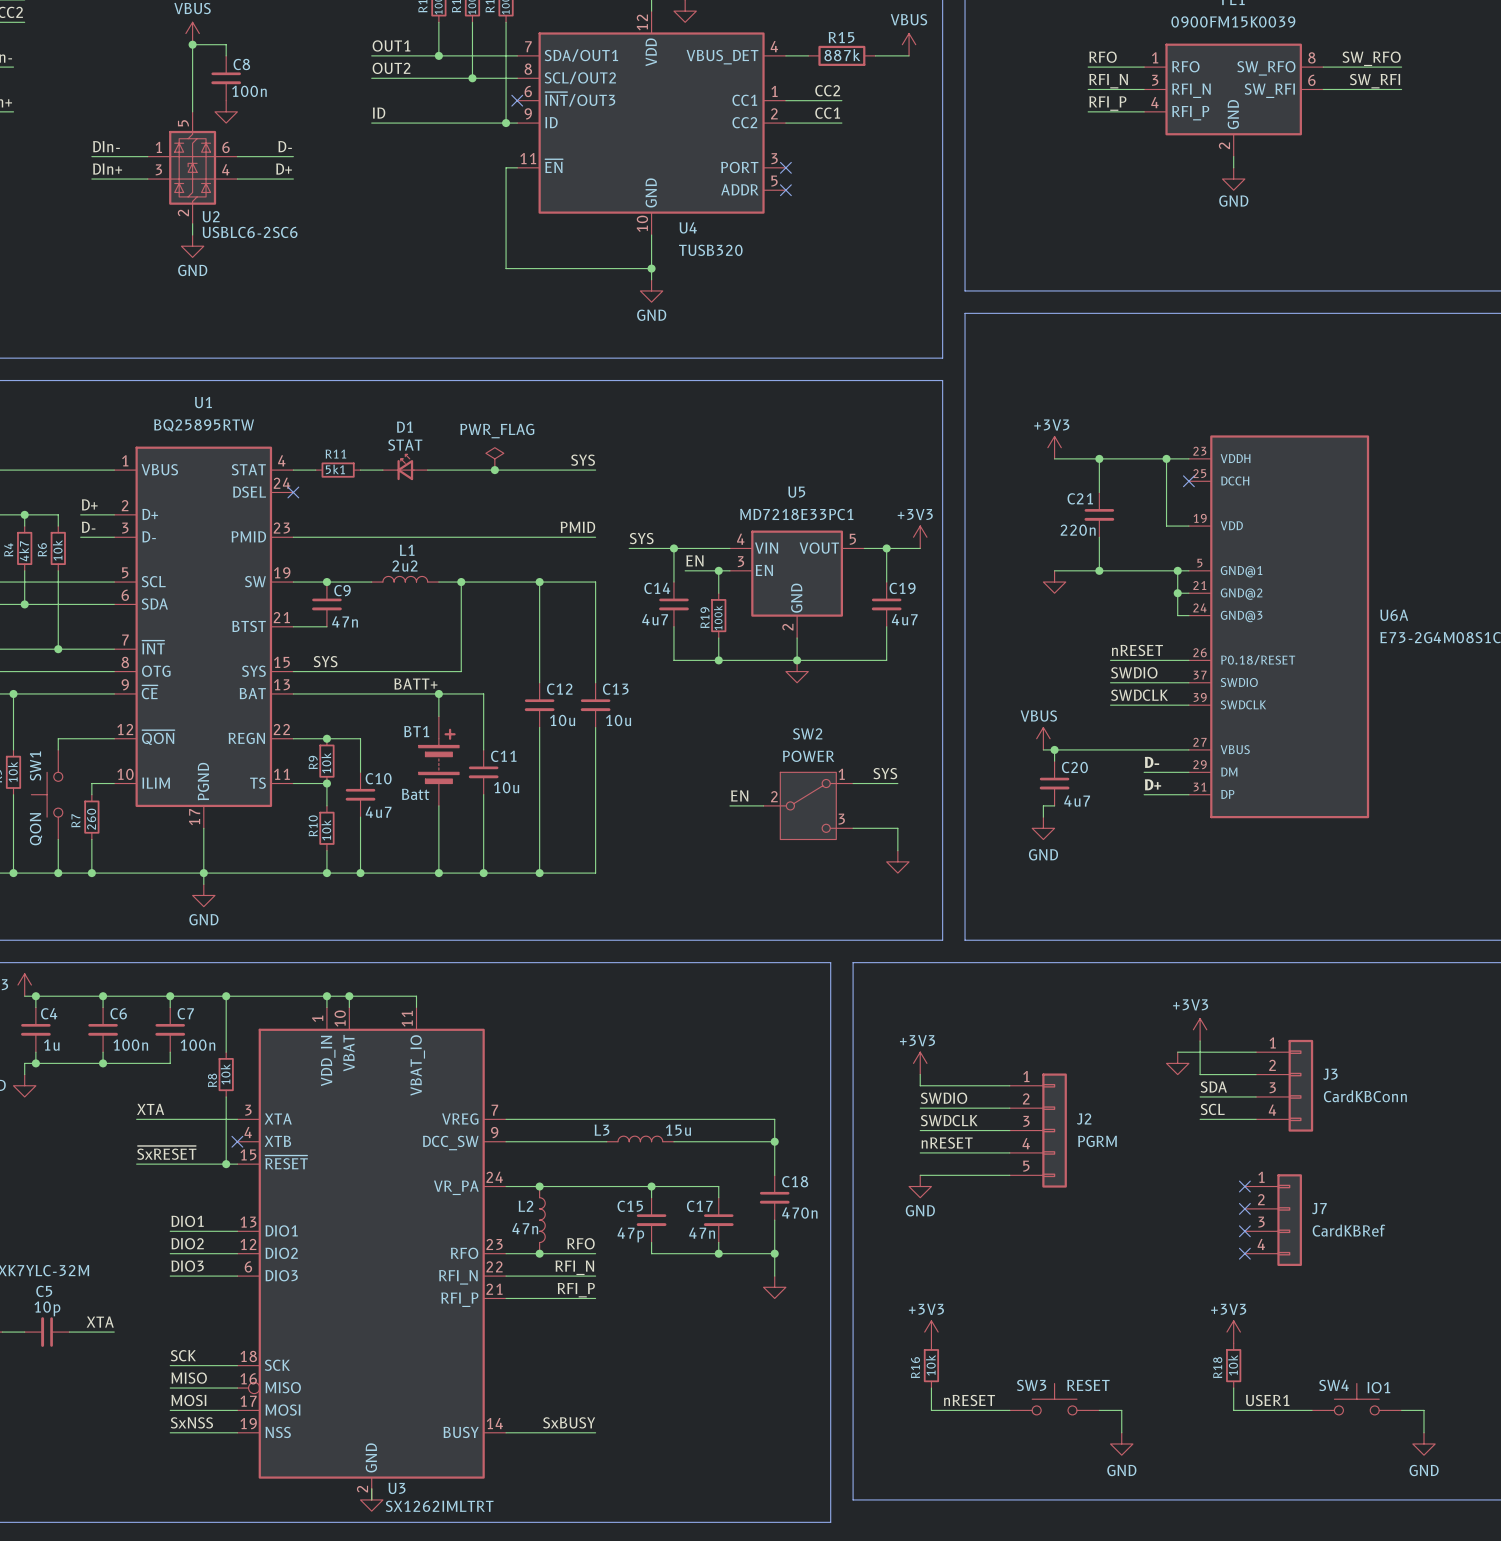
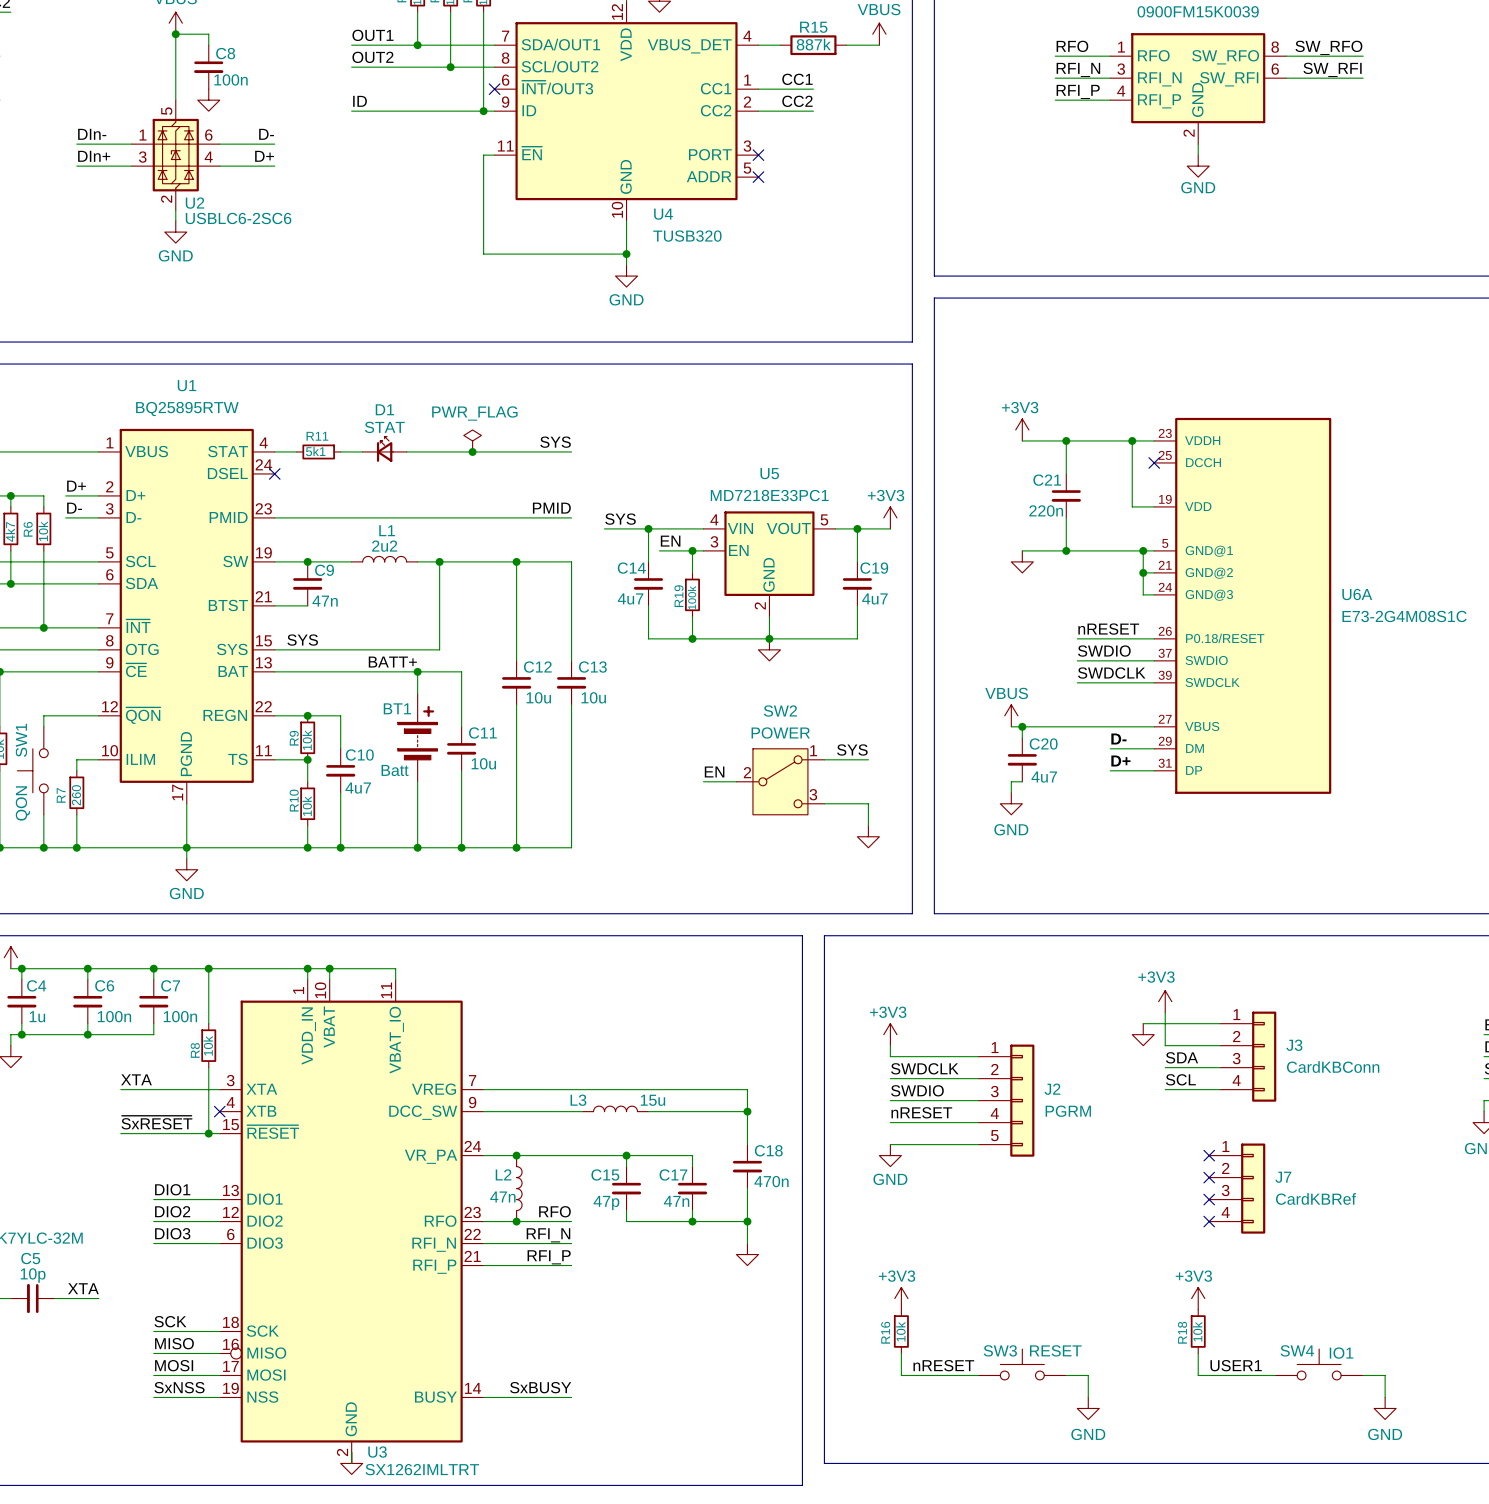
label: CC2 (827, 90) -> CC1 (797, 79)
label: CC1 (827, 113) -> CC2 (797, 101)
label: SWDIO (944, 1098) -> SWDCLK (924, 1068)
label: SWDCLK (949, 1120) -> SWDIO (917, 1090)

